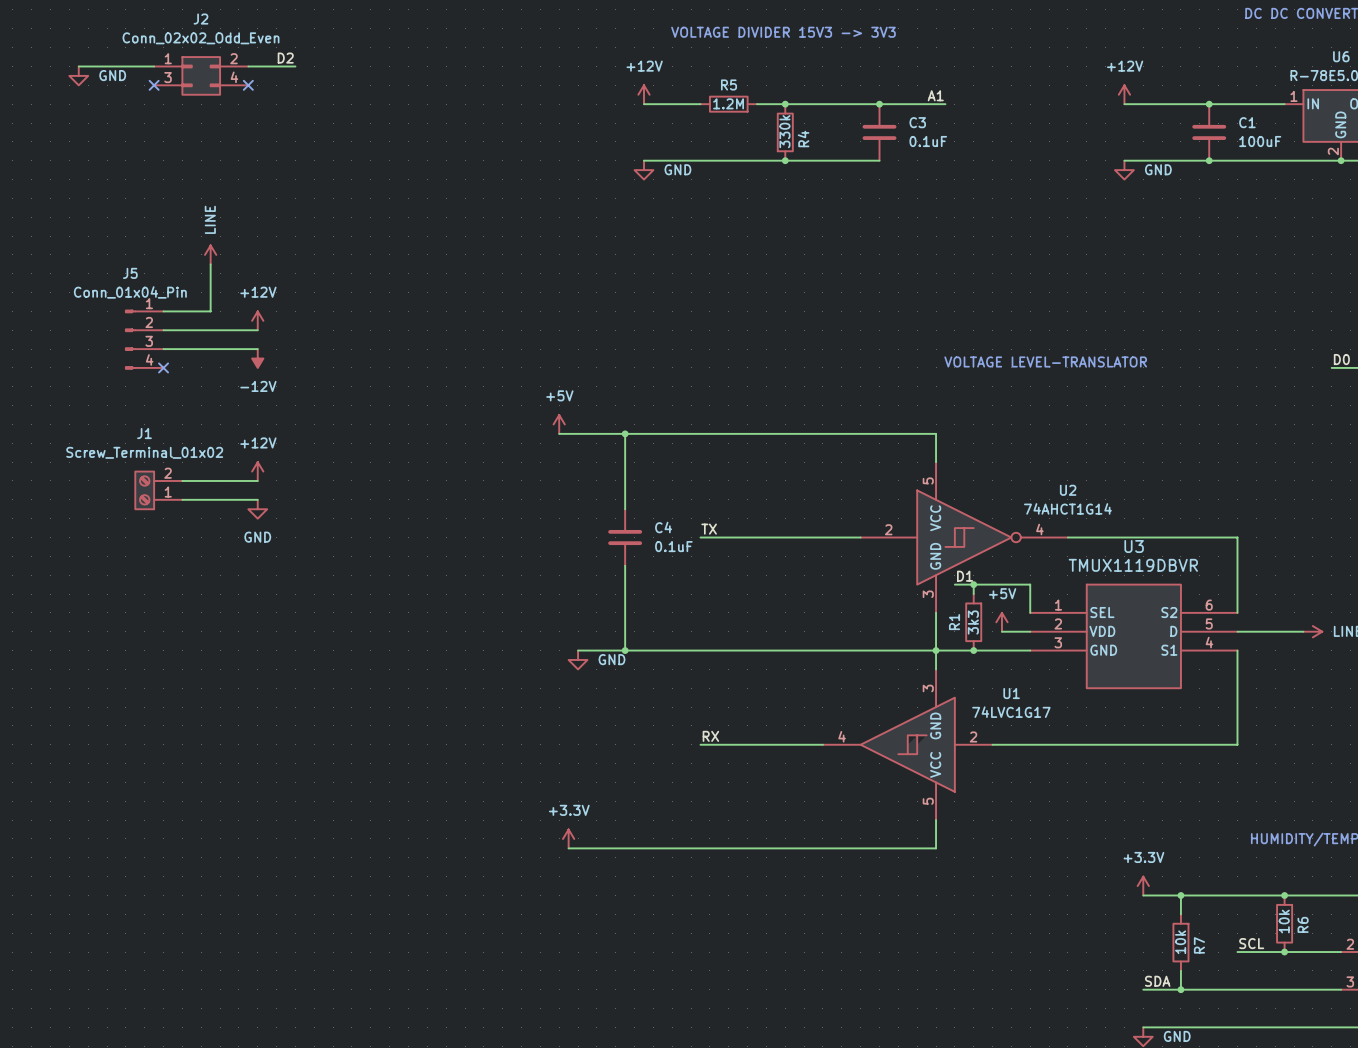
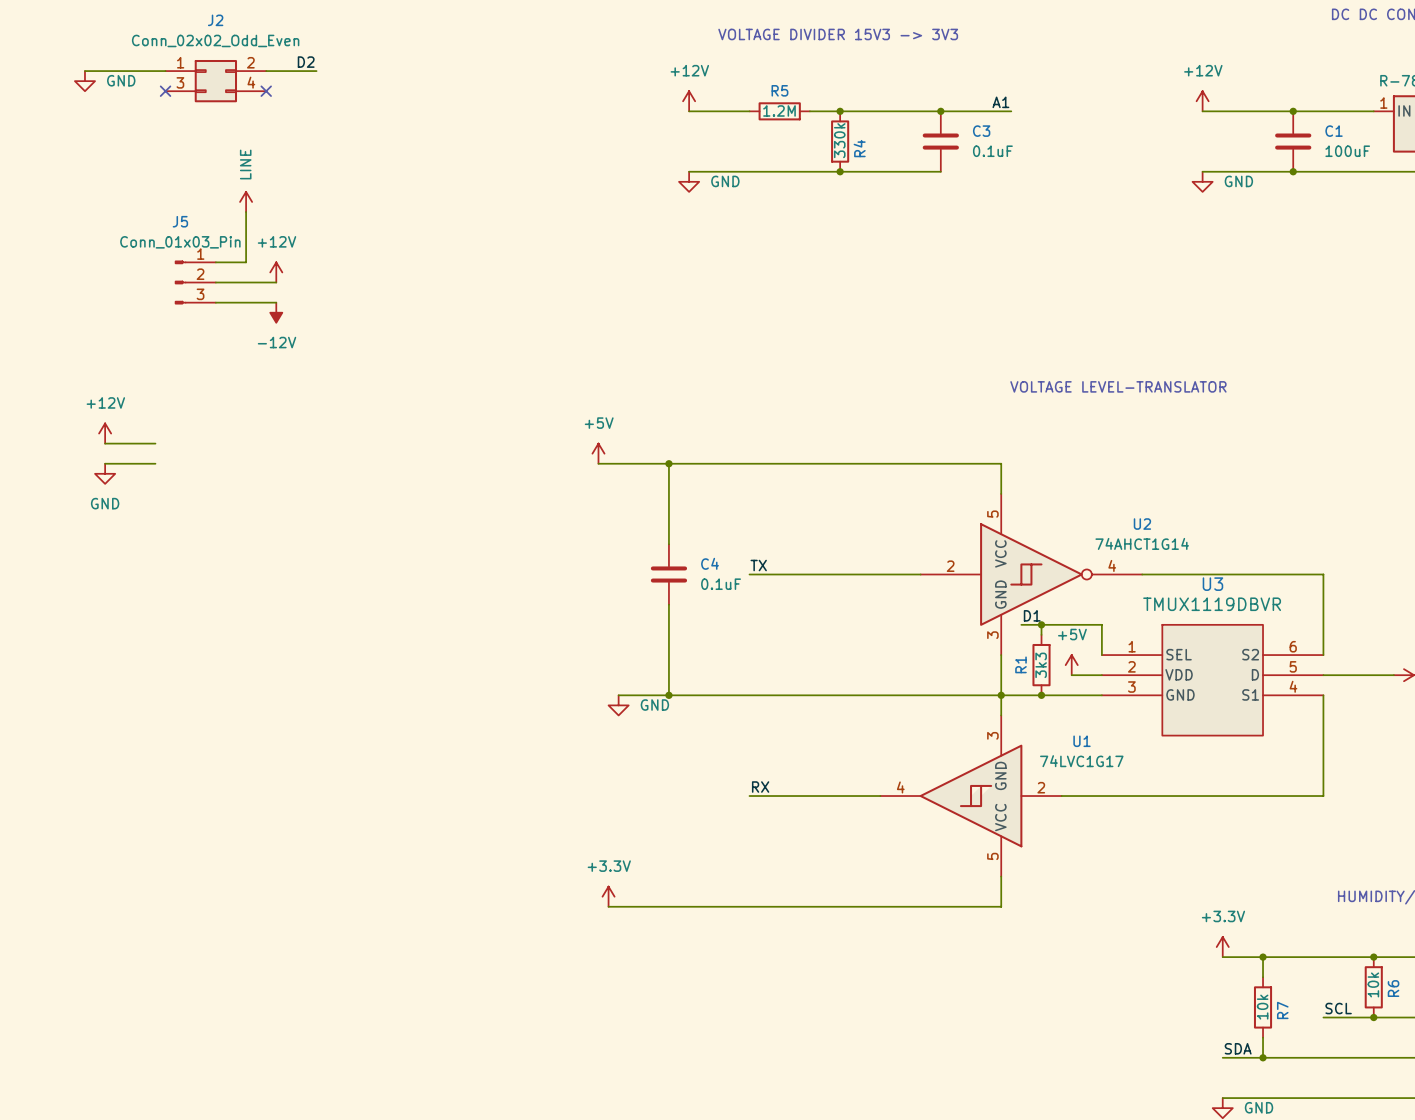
wire: none -> (246, 212) (246, 262) (215, 262)
power symbol position: LINE (210, 254) -> LINE (246, 201)
wire: none -> (215, 282) (276, 282)
wire: (210, 264) (210, 311) (163, 311) -> none
wire: none -> (215, 302) (276, 302)
J5 value: Conn_01x04_Pin (130, 292) -> Conn_01x03_Pin (180, 242)
J5 symbol: [125, 309, 164, 370] -> [174, 260, 216, 305]
power symbol position: +12V (257, 320) -> +12V (276, 272)
wire: (163, 330) (257, 330) -> none
wire: (163, 349) (257, 349) -> none
power symbol position: -12V (257, 358) -> -12V (276, 312)
no-connect mark: (163, 367) -> none
power symbol: none -> +12V (105, 433)
wire: none -> (105, 443) (155, 443)
wire: none -> (105, 463) (155, 463)
power symbol: +12V (257, 471) -> none
wire: (182, 480) (257, 480) -> none
J1: Screw_Terminal_01x02 (158, 490) -> none
wire: (182, 499) (257, 499) -> none
power symbol position: GND (257, 509) -> GND (105, 473)

